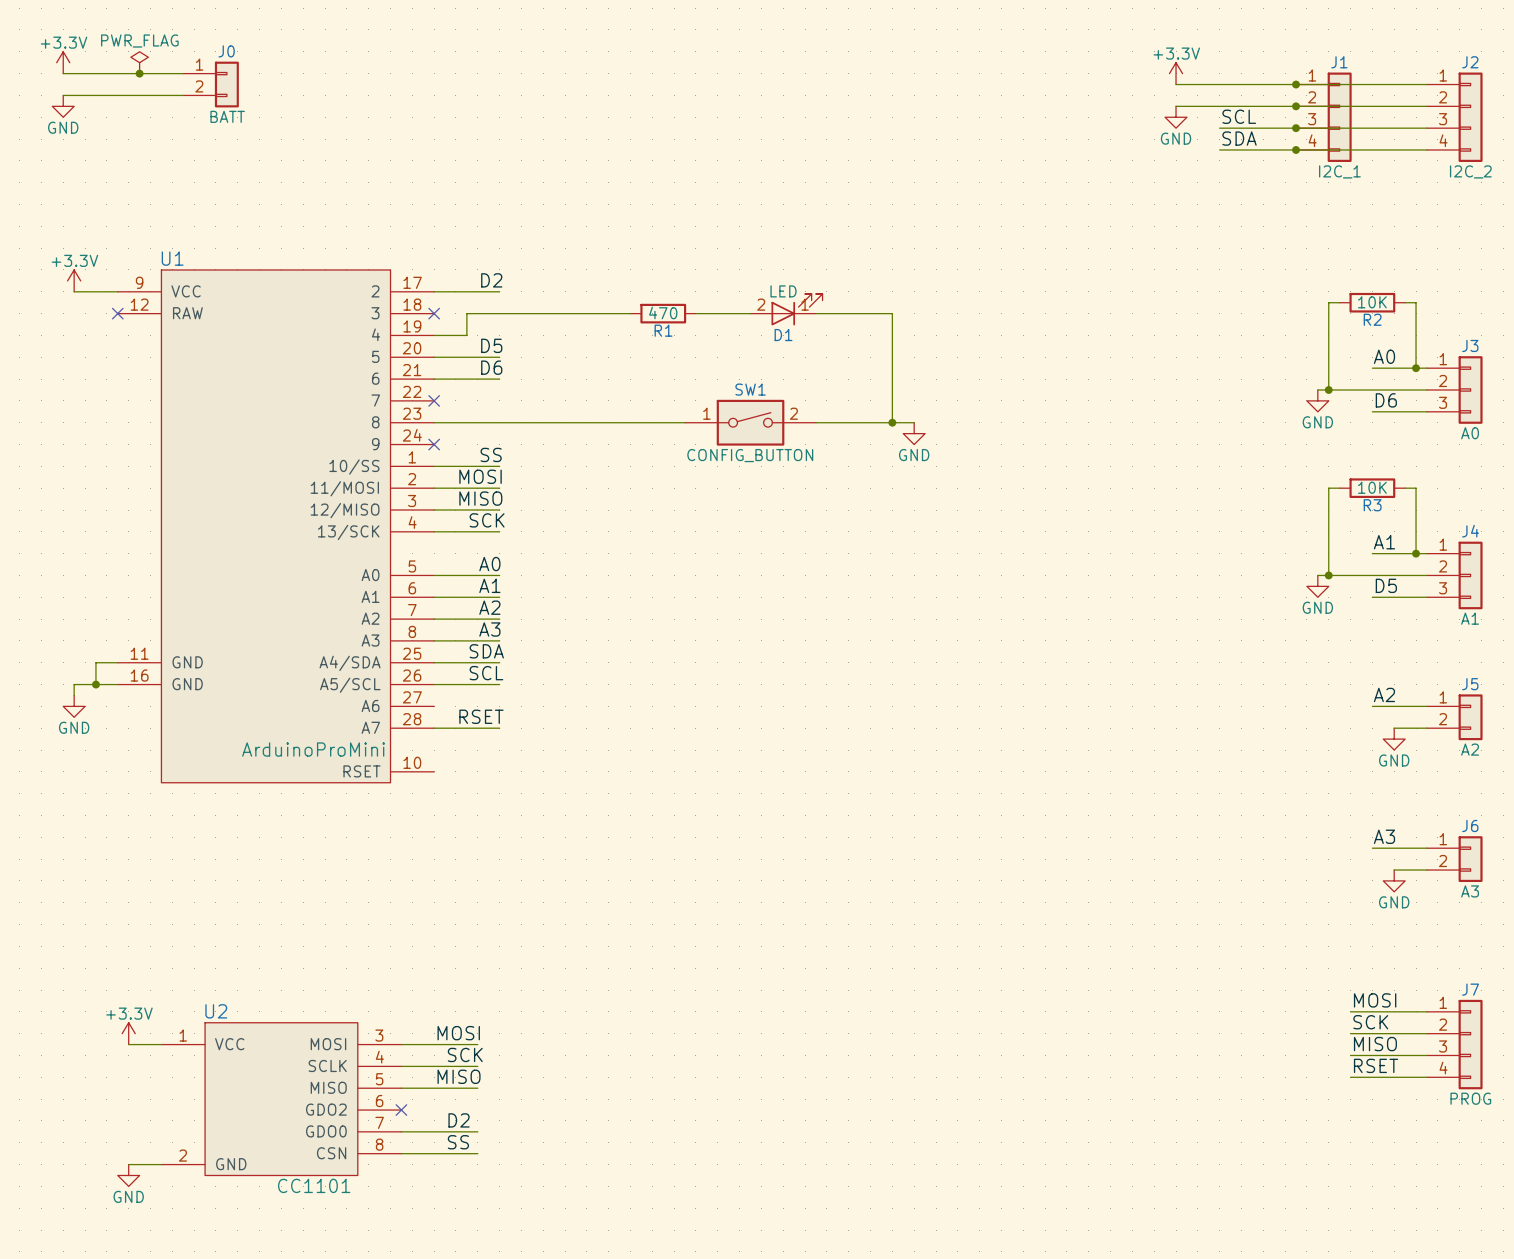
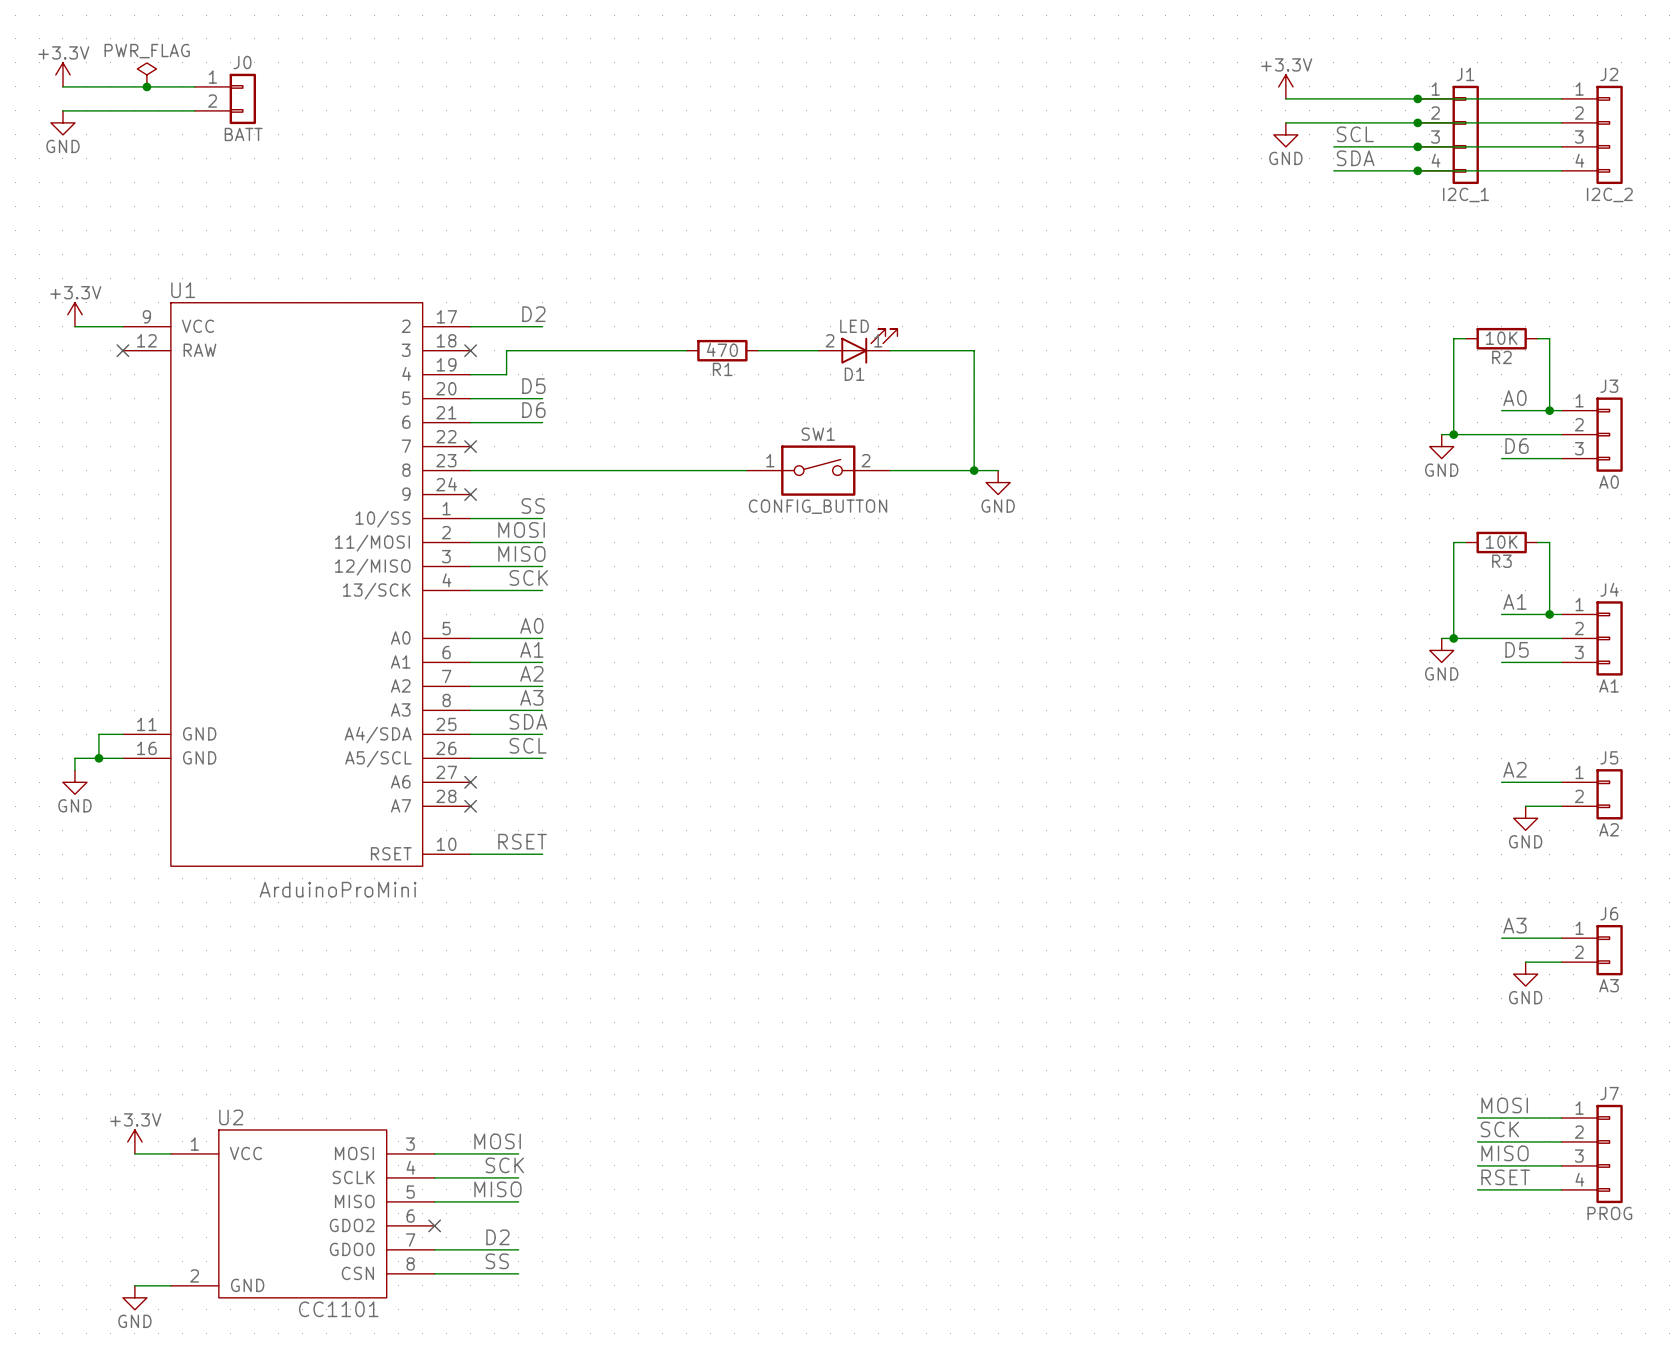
no-connect mark: none -> (470, 782)
label position: RSET (481, 716) -> RSET (522, 841)
wire: (434, 728) (499, 728) -> (470, 854) (542, 854)
no-connect mark: none -> (470, 806)
U1 value position: ArduinoProMini (313, 749) -> ArduinoProMini (338, 889)

